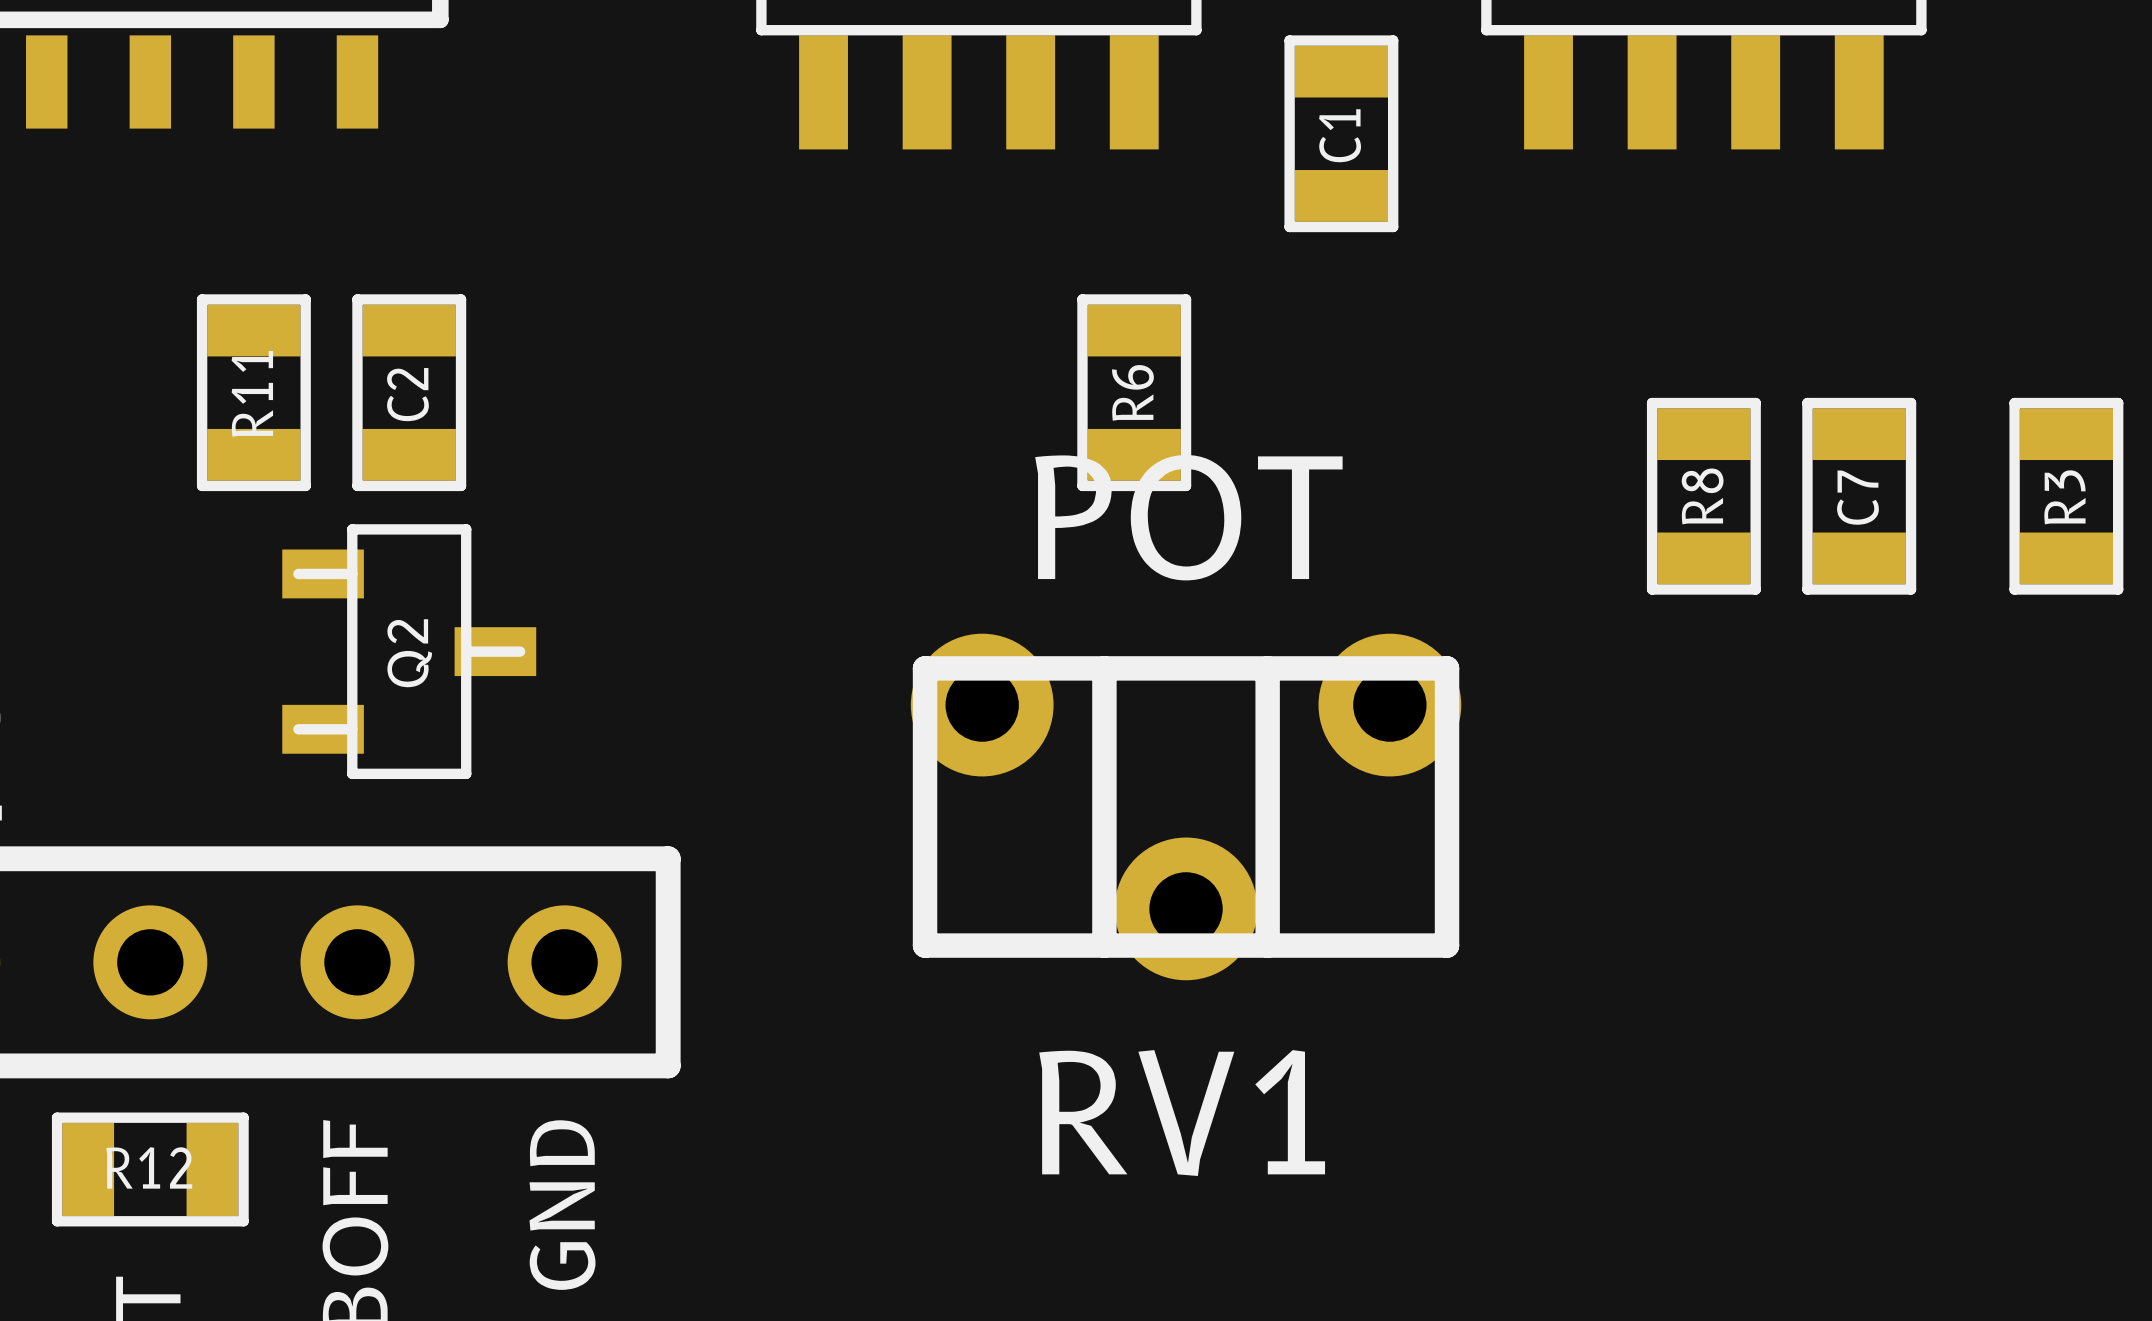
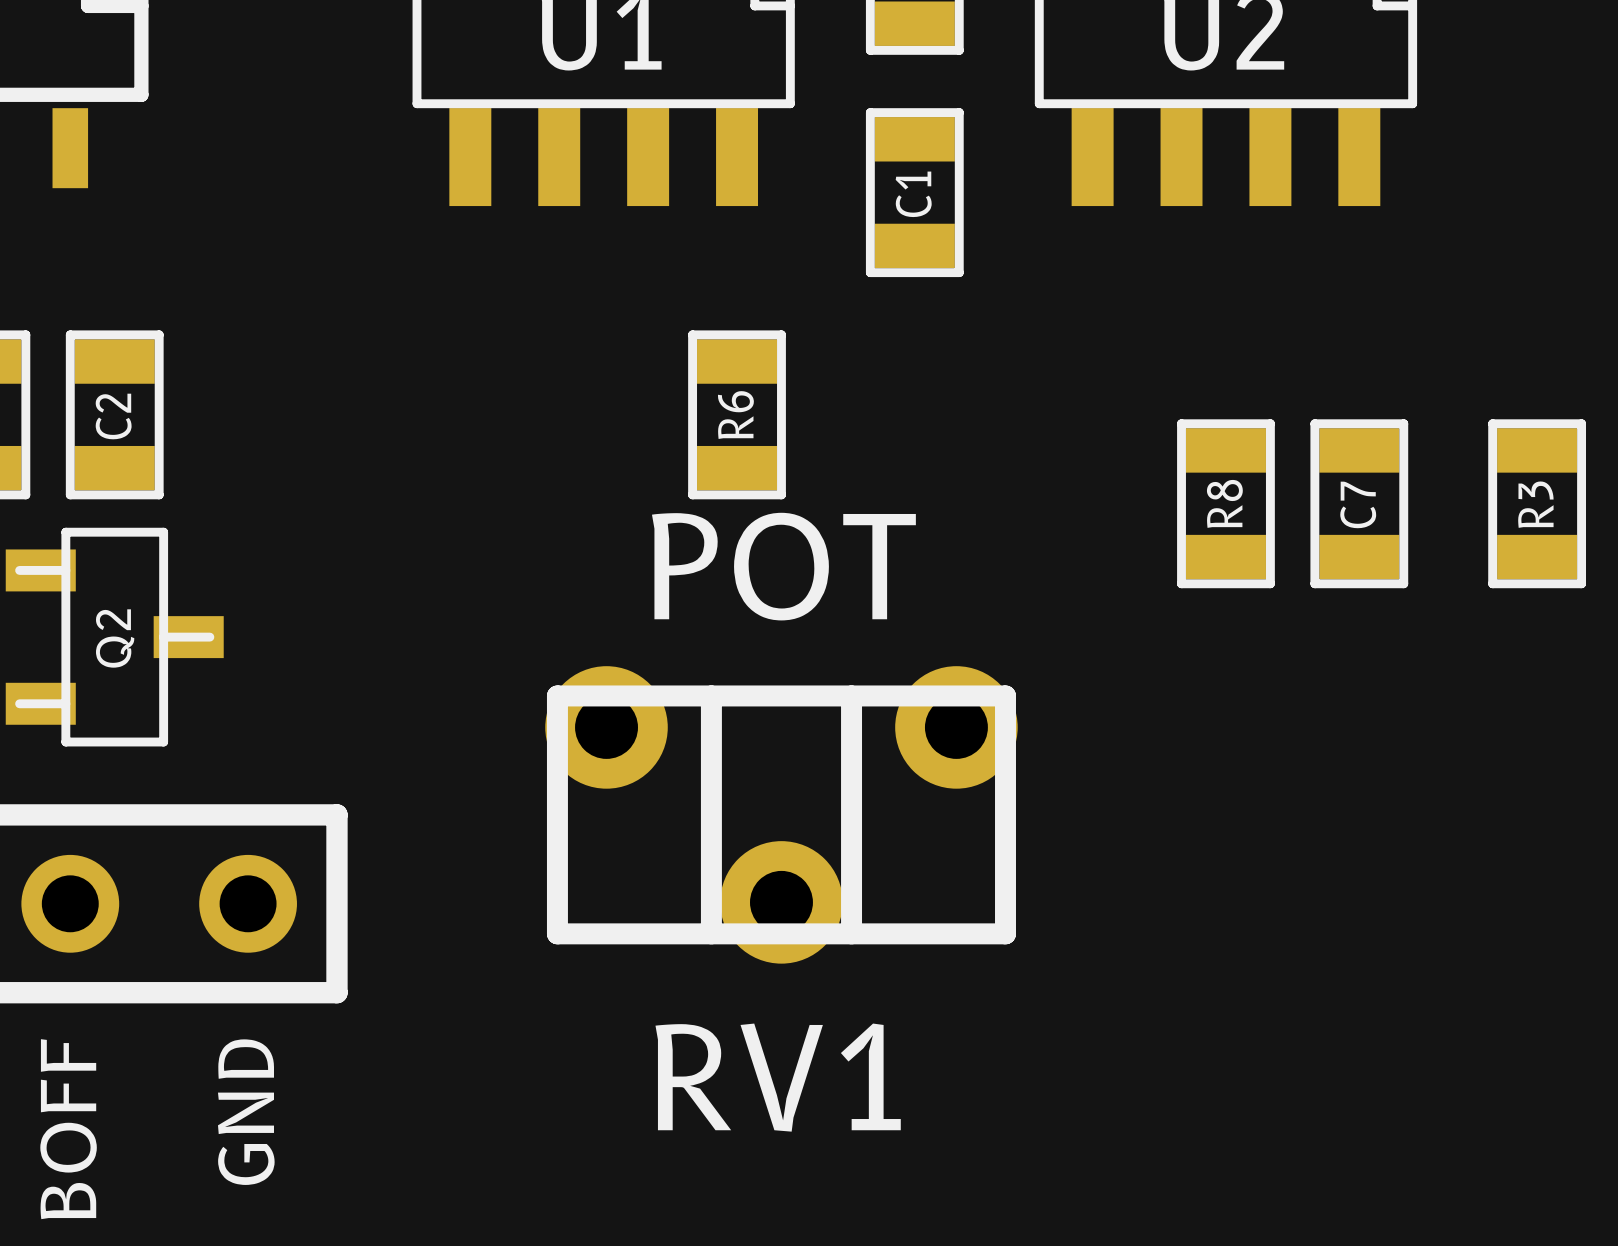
RV1 position: (1186, 806) -> (781, 814)

